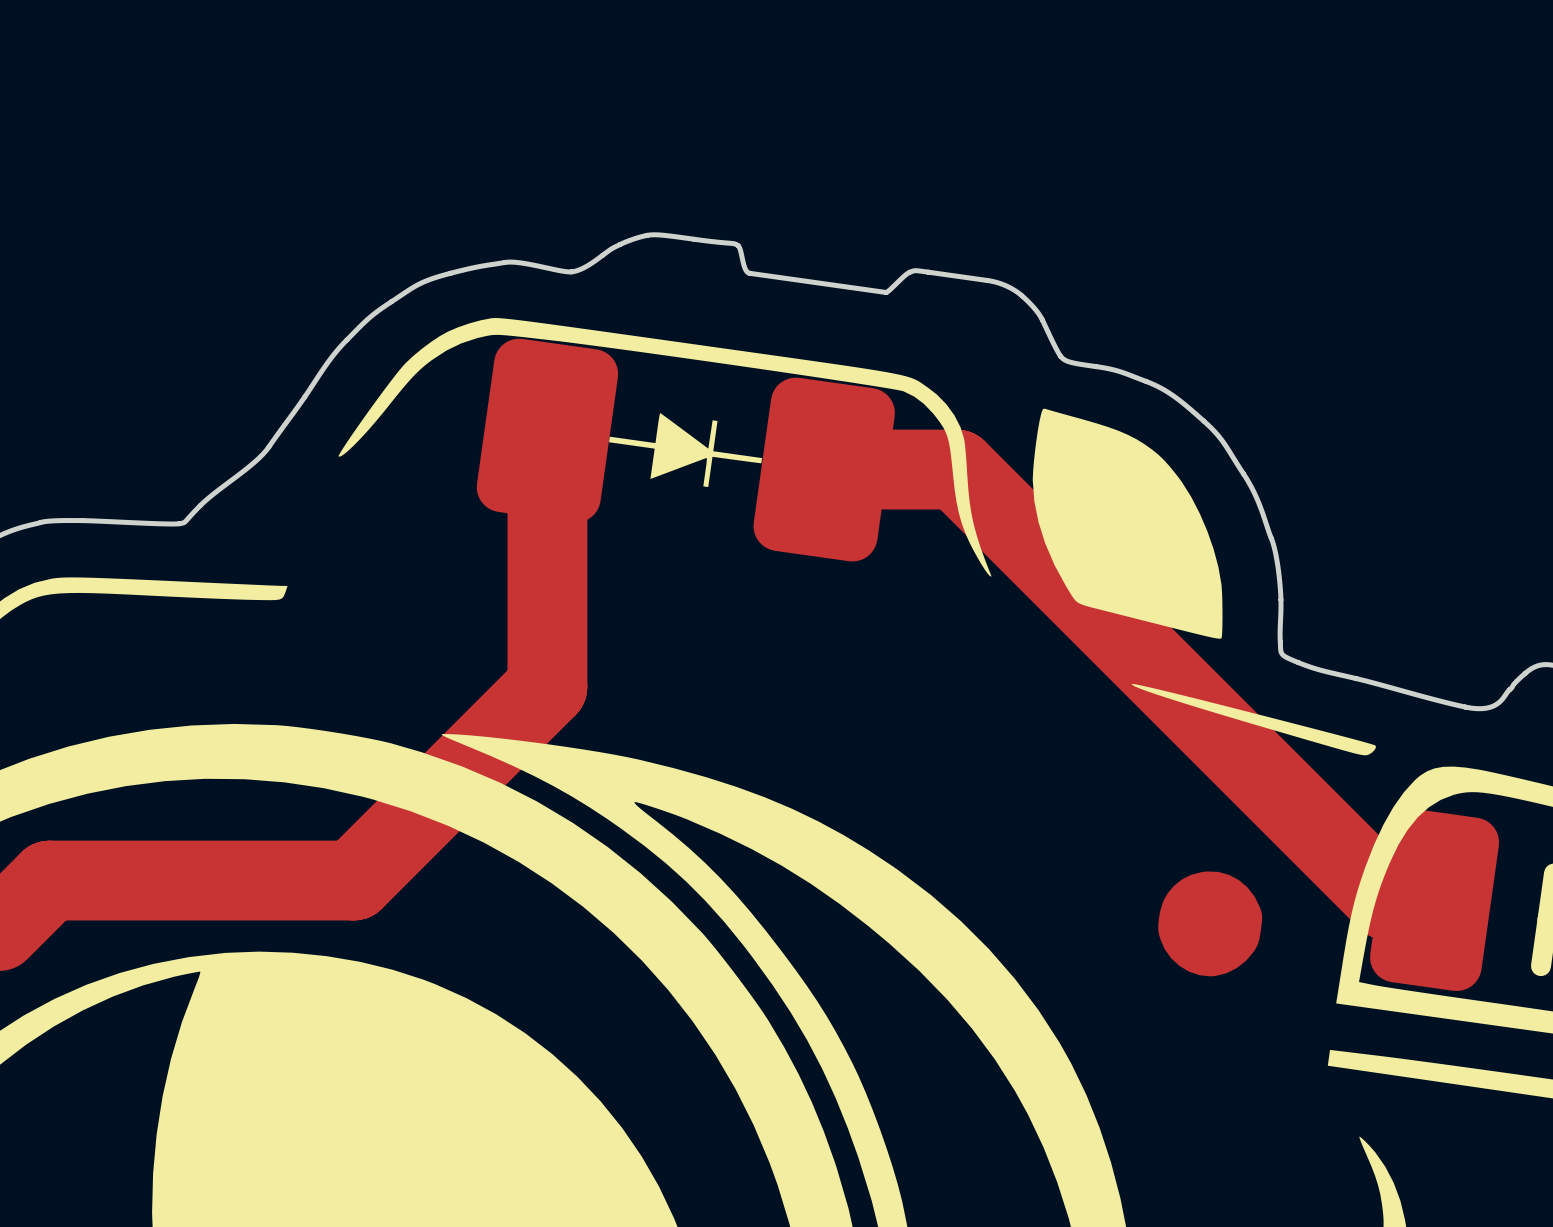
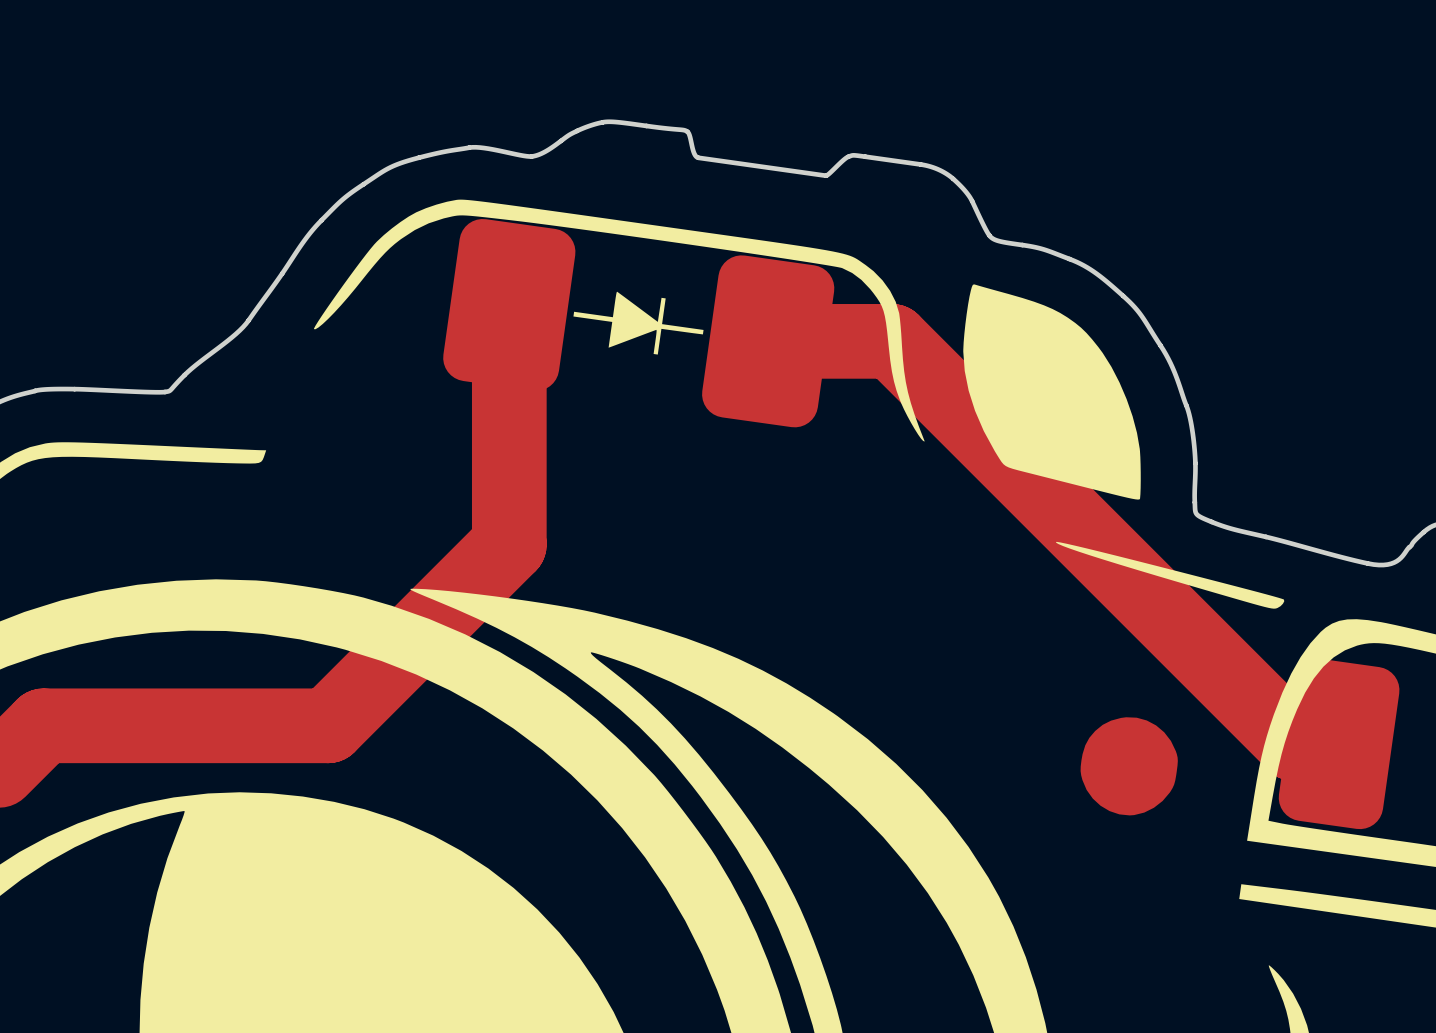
drawing shape: [609, 413, 763, 488] -> [573, 291, 704, 355]

